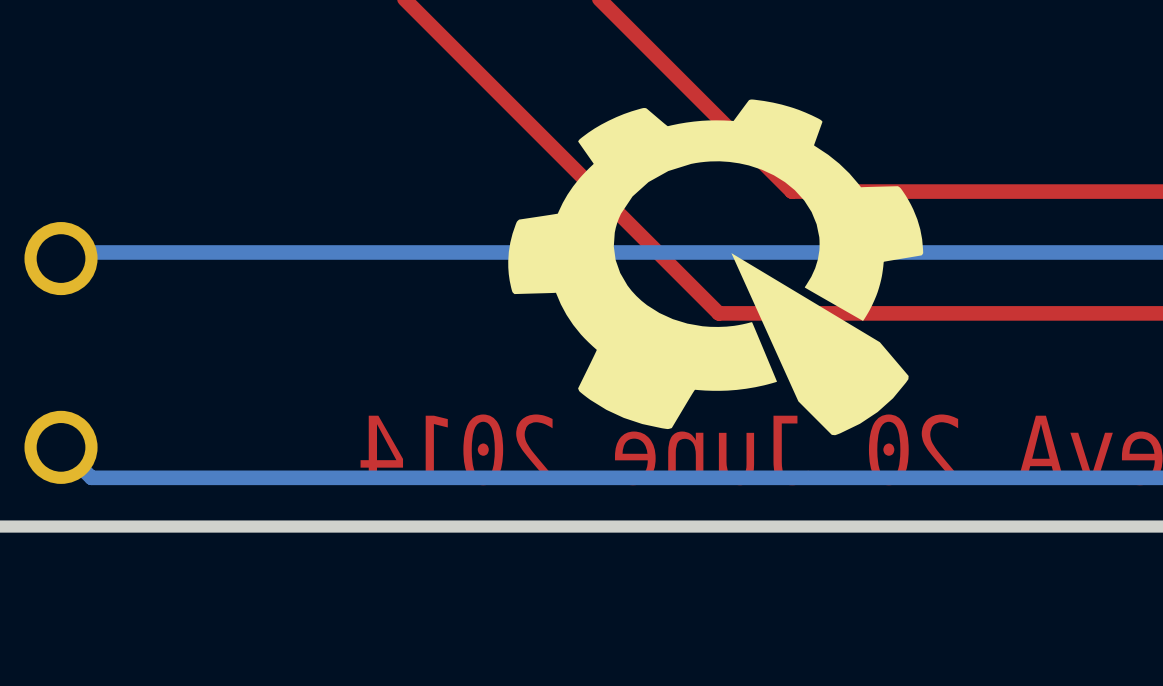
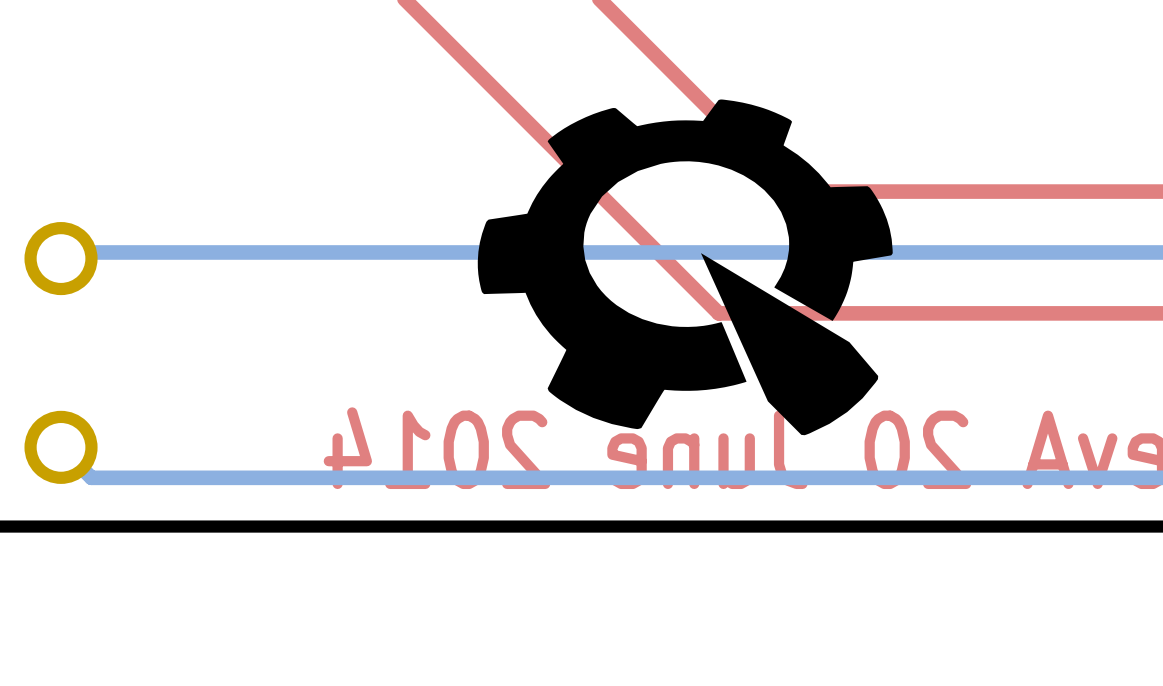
drawing position: (715, 267) -> (685, 267)

